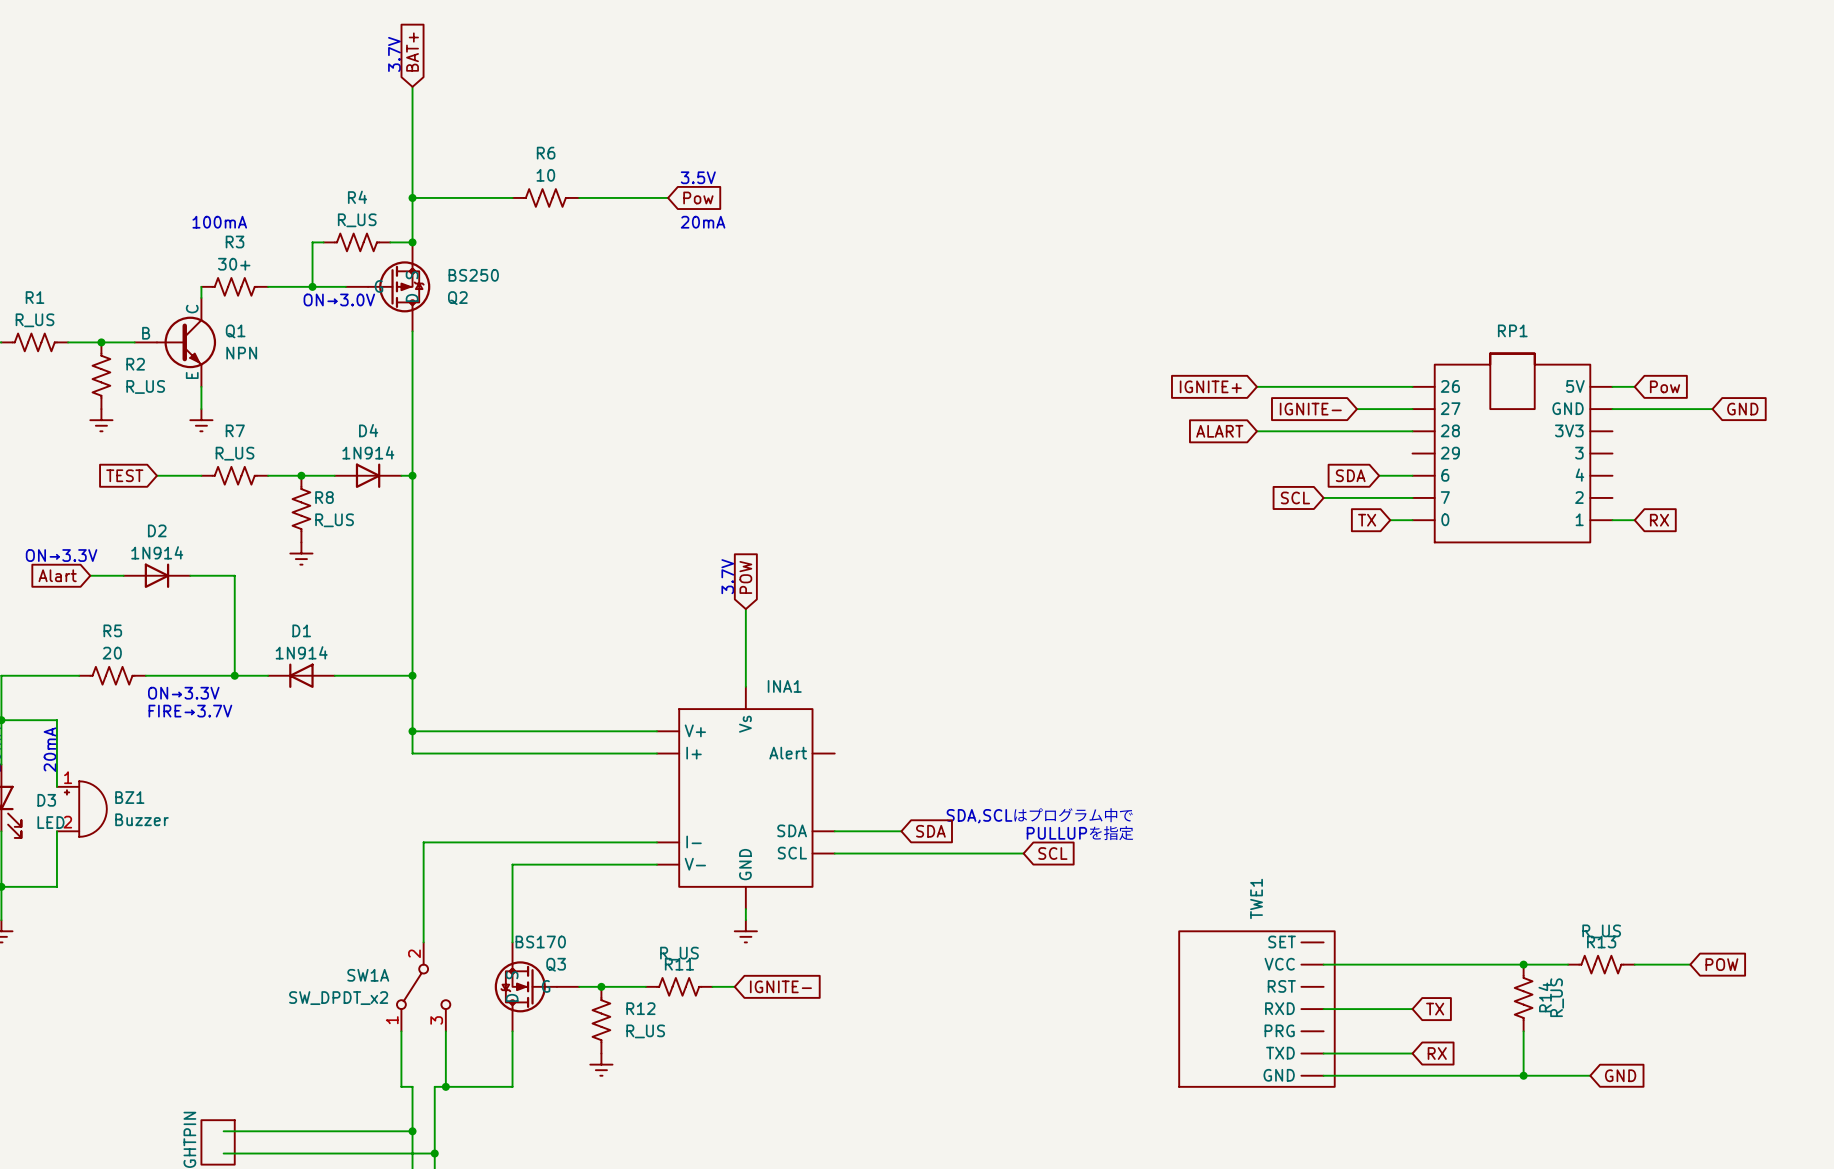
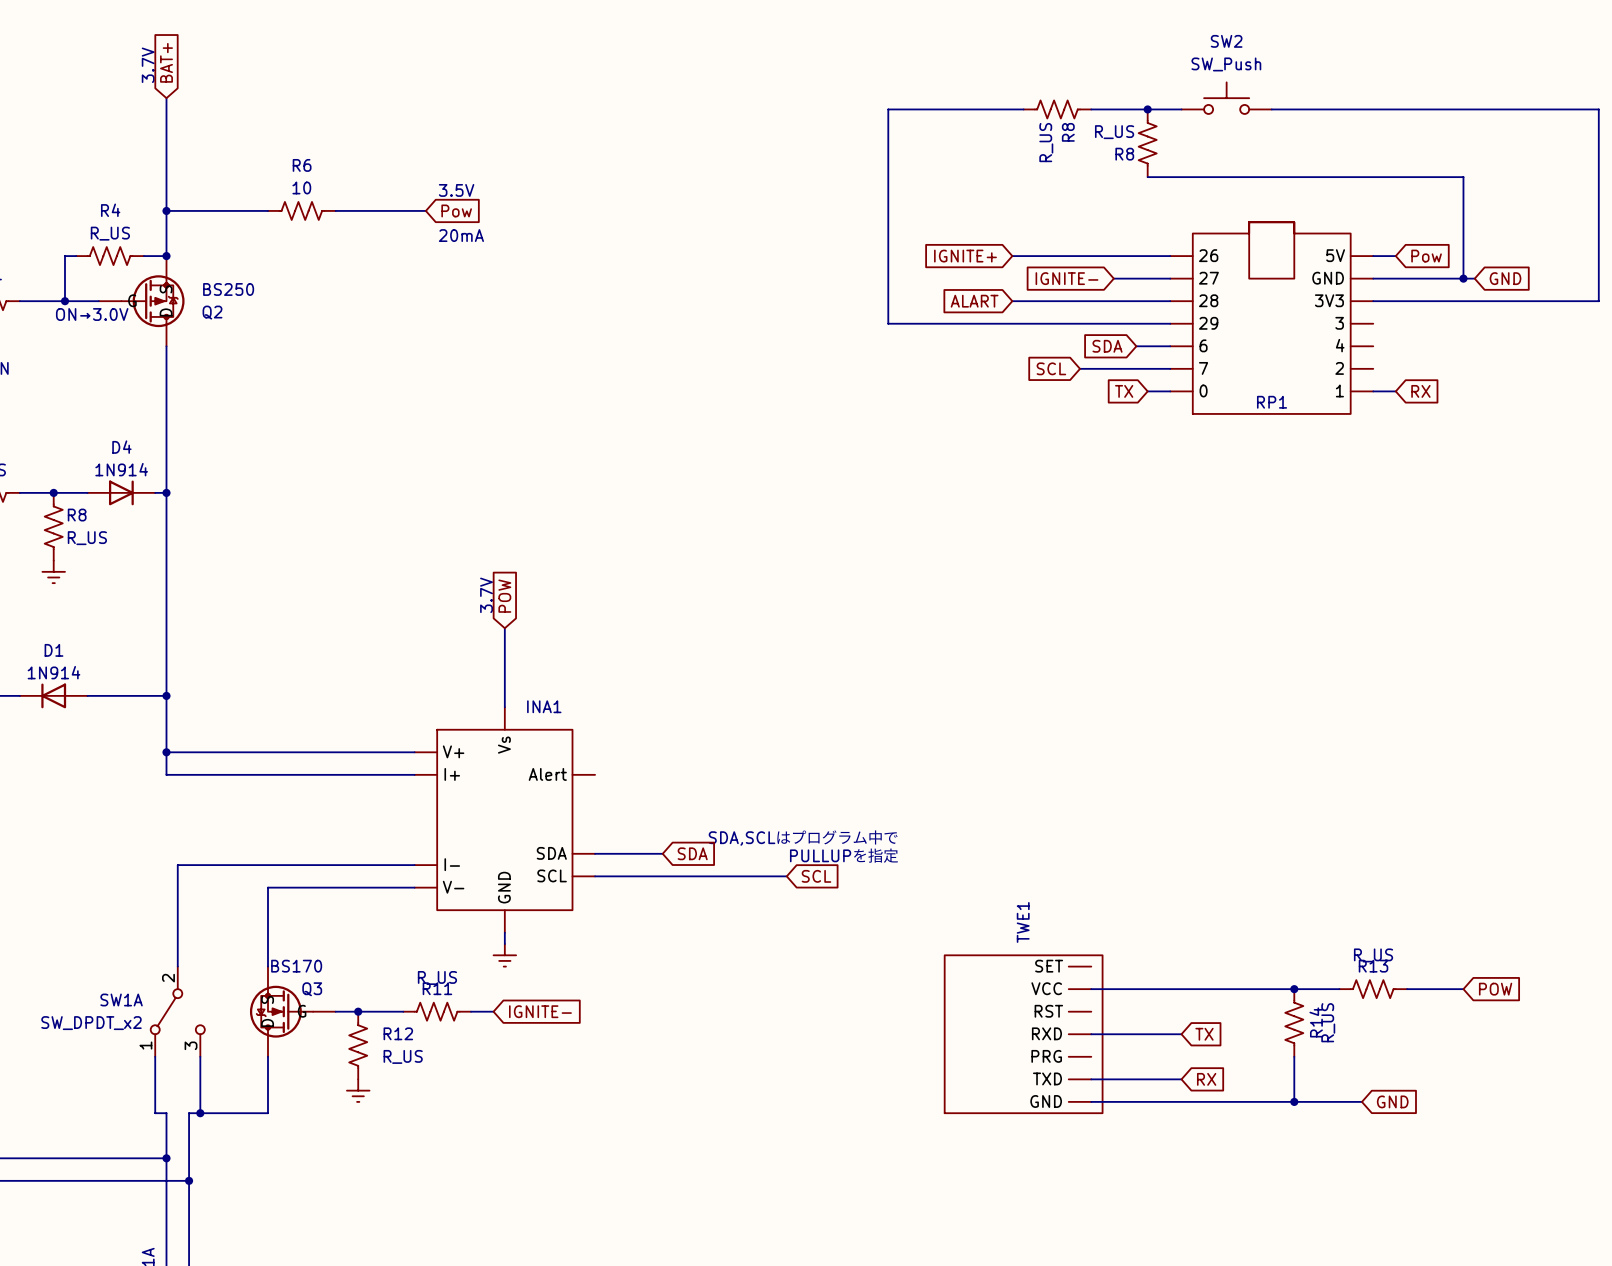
SW2: none -> SW_Push (1226, 98)
wire: none -> (1023, 109) (888, 109) (888, 323) (1170, 323)
R8: none -> R_US (1057, 109)
wire: none -> (1091, 109) (1181, 109)
junction: none -> (1147, 109)
wire: none -> (1271, 109) (1598, 109) (1598, 301) (1373, 301)
R8: none -> R_US (1147, 143)
wire: none -> (1147, 177) (1463, 177) (1463, 278)
junction: none -> (1463, 278)
RP1 name position: RP1 (1512, 330) -> RP1 (1272, 402)
global label position: IGNITE+ (1210, 386) -> IGNITE+ (965, 256)
wire: (1256, 386) (1412, 386) -> (1012, 256) (1170, 256)
wire: (1612, 386) (1634, 386) -> (1373, 256) (1395, 256)
global label position: Pow (1665, 386) -> Pow (1426, 256)
global label position: IGNITE- (1310, 409) -> IGNITE- (1066, 278)
wire: (1356, 409) (1412, 409) -> (1113, 278) (1170, 278)
wire: (1612, 409) (1712, 409) -> (1373, 278) (1474, 278)
global label position: GND (1742, 409) -> GND (1505, 278)
global label position: ALART (1219, 431) -> ALART (974, 301)
wire: (1256, 431) (1412, 431) -> (1012, 301) (1170, 301)
RP1 position: (1512, 447) -> (1271, 318)
global label position: SDA (1350, 475) -> SDA (1107, 346)
wire: (1379, 475) (1412, 475) -> (1136, 346) (1170, 346)
global label position: SCL (1295, 497) -> SCL (1051, 368)
wire: (1323, 497) (1412, 497) -> (1080, 368) (1170, 368)
global label position: TX (1367, 520) -> TX (1124, 391)
wire: (1390, 520) (1412, 520) -> (1147, 391) (1170, 391)
wire: (1612, 520) (1634, 520) -> (1373, 391) (1395, 391)
global label position: RX (1659, 520) -> RX (1420, 391)

